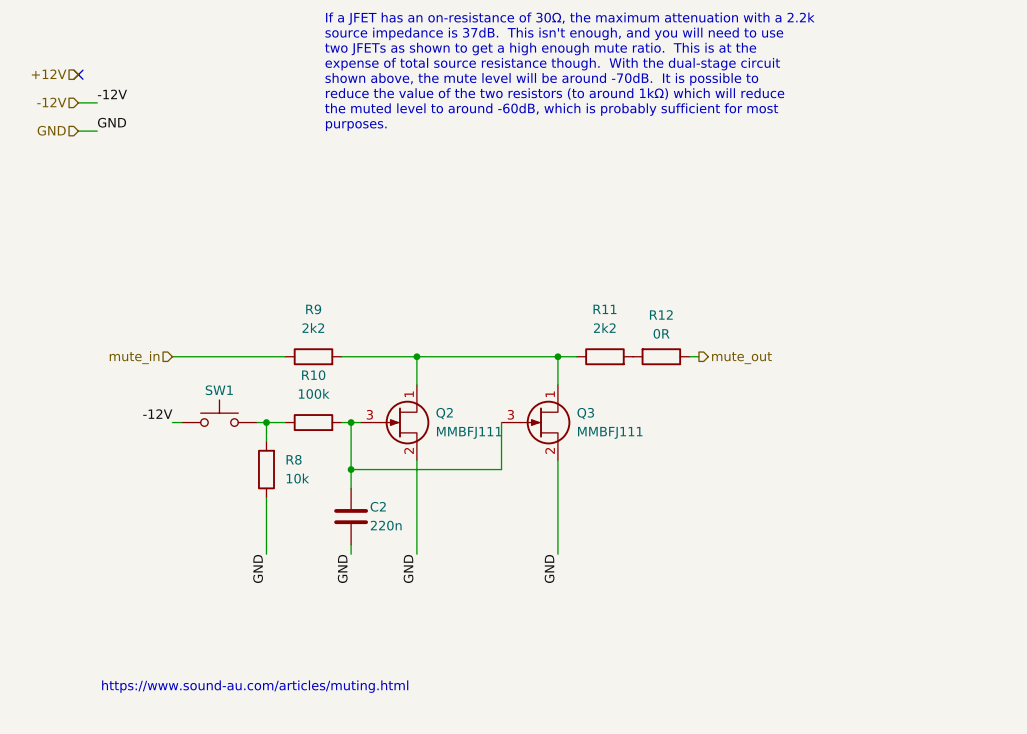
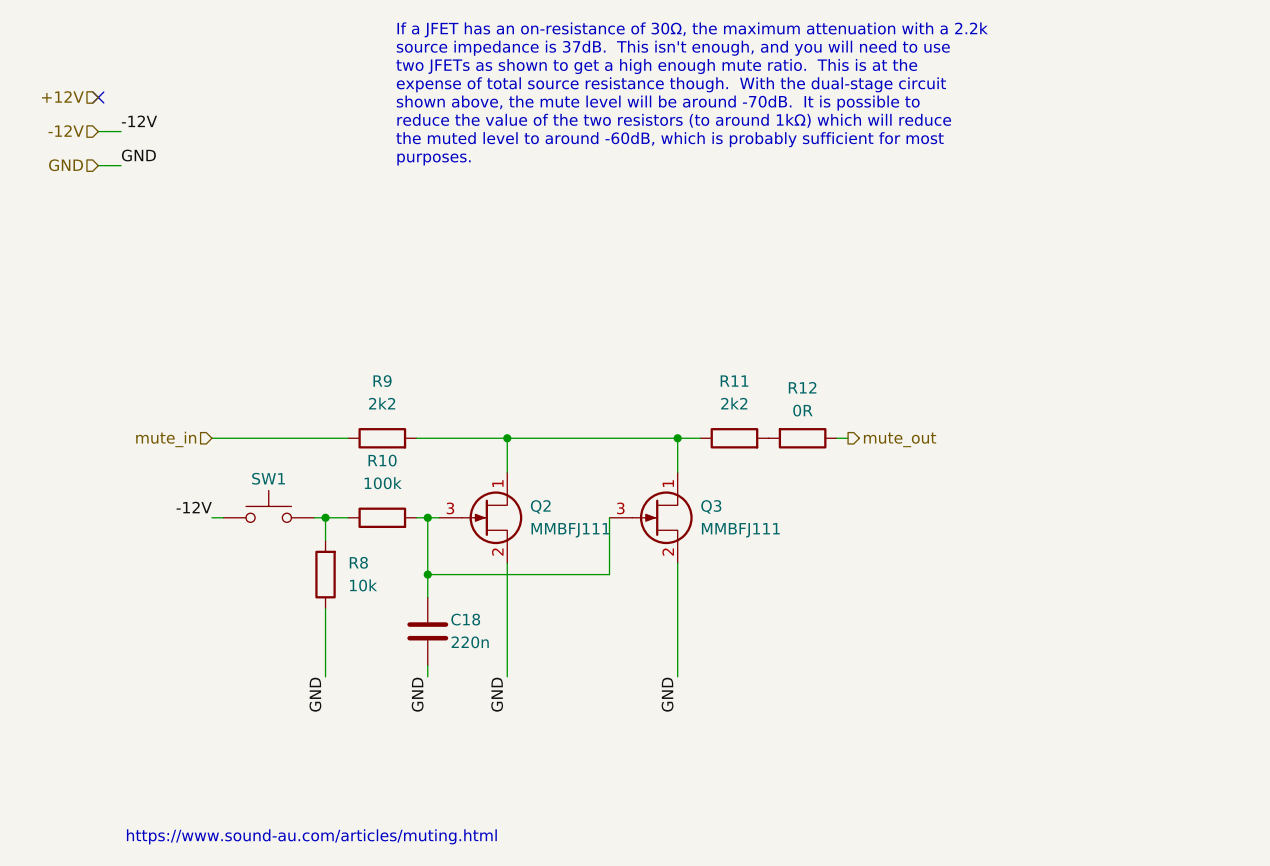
C2 name: C2 (378, 506) -> C18 (465, 619)

